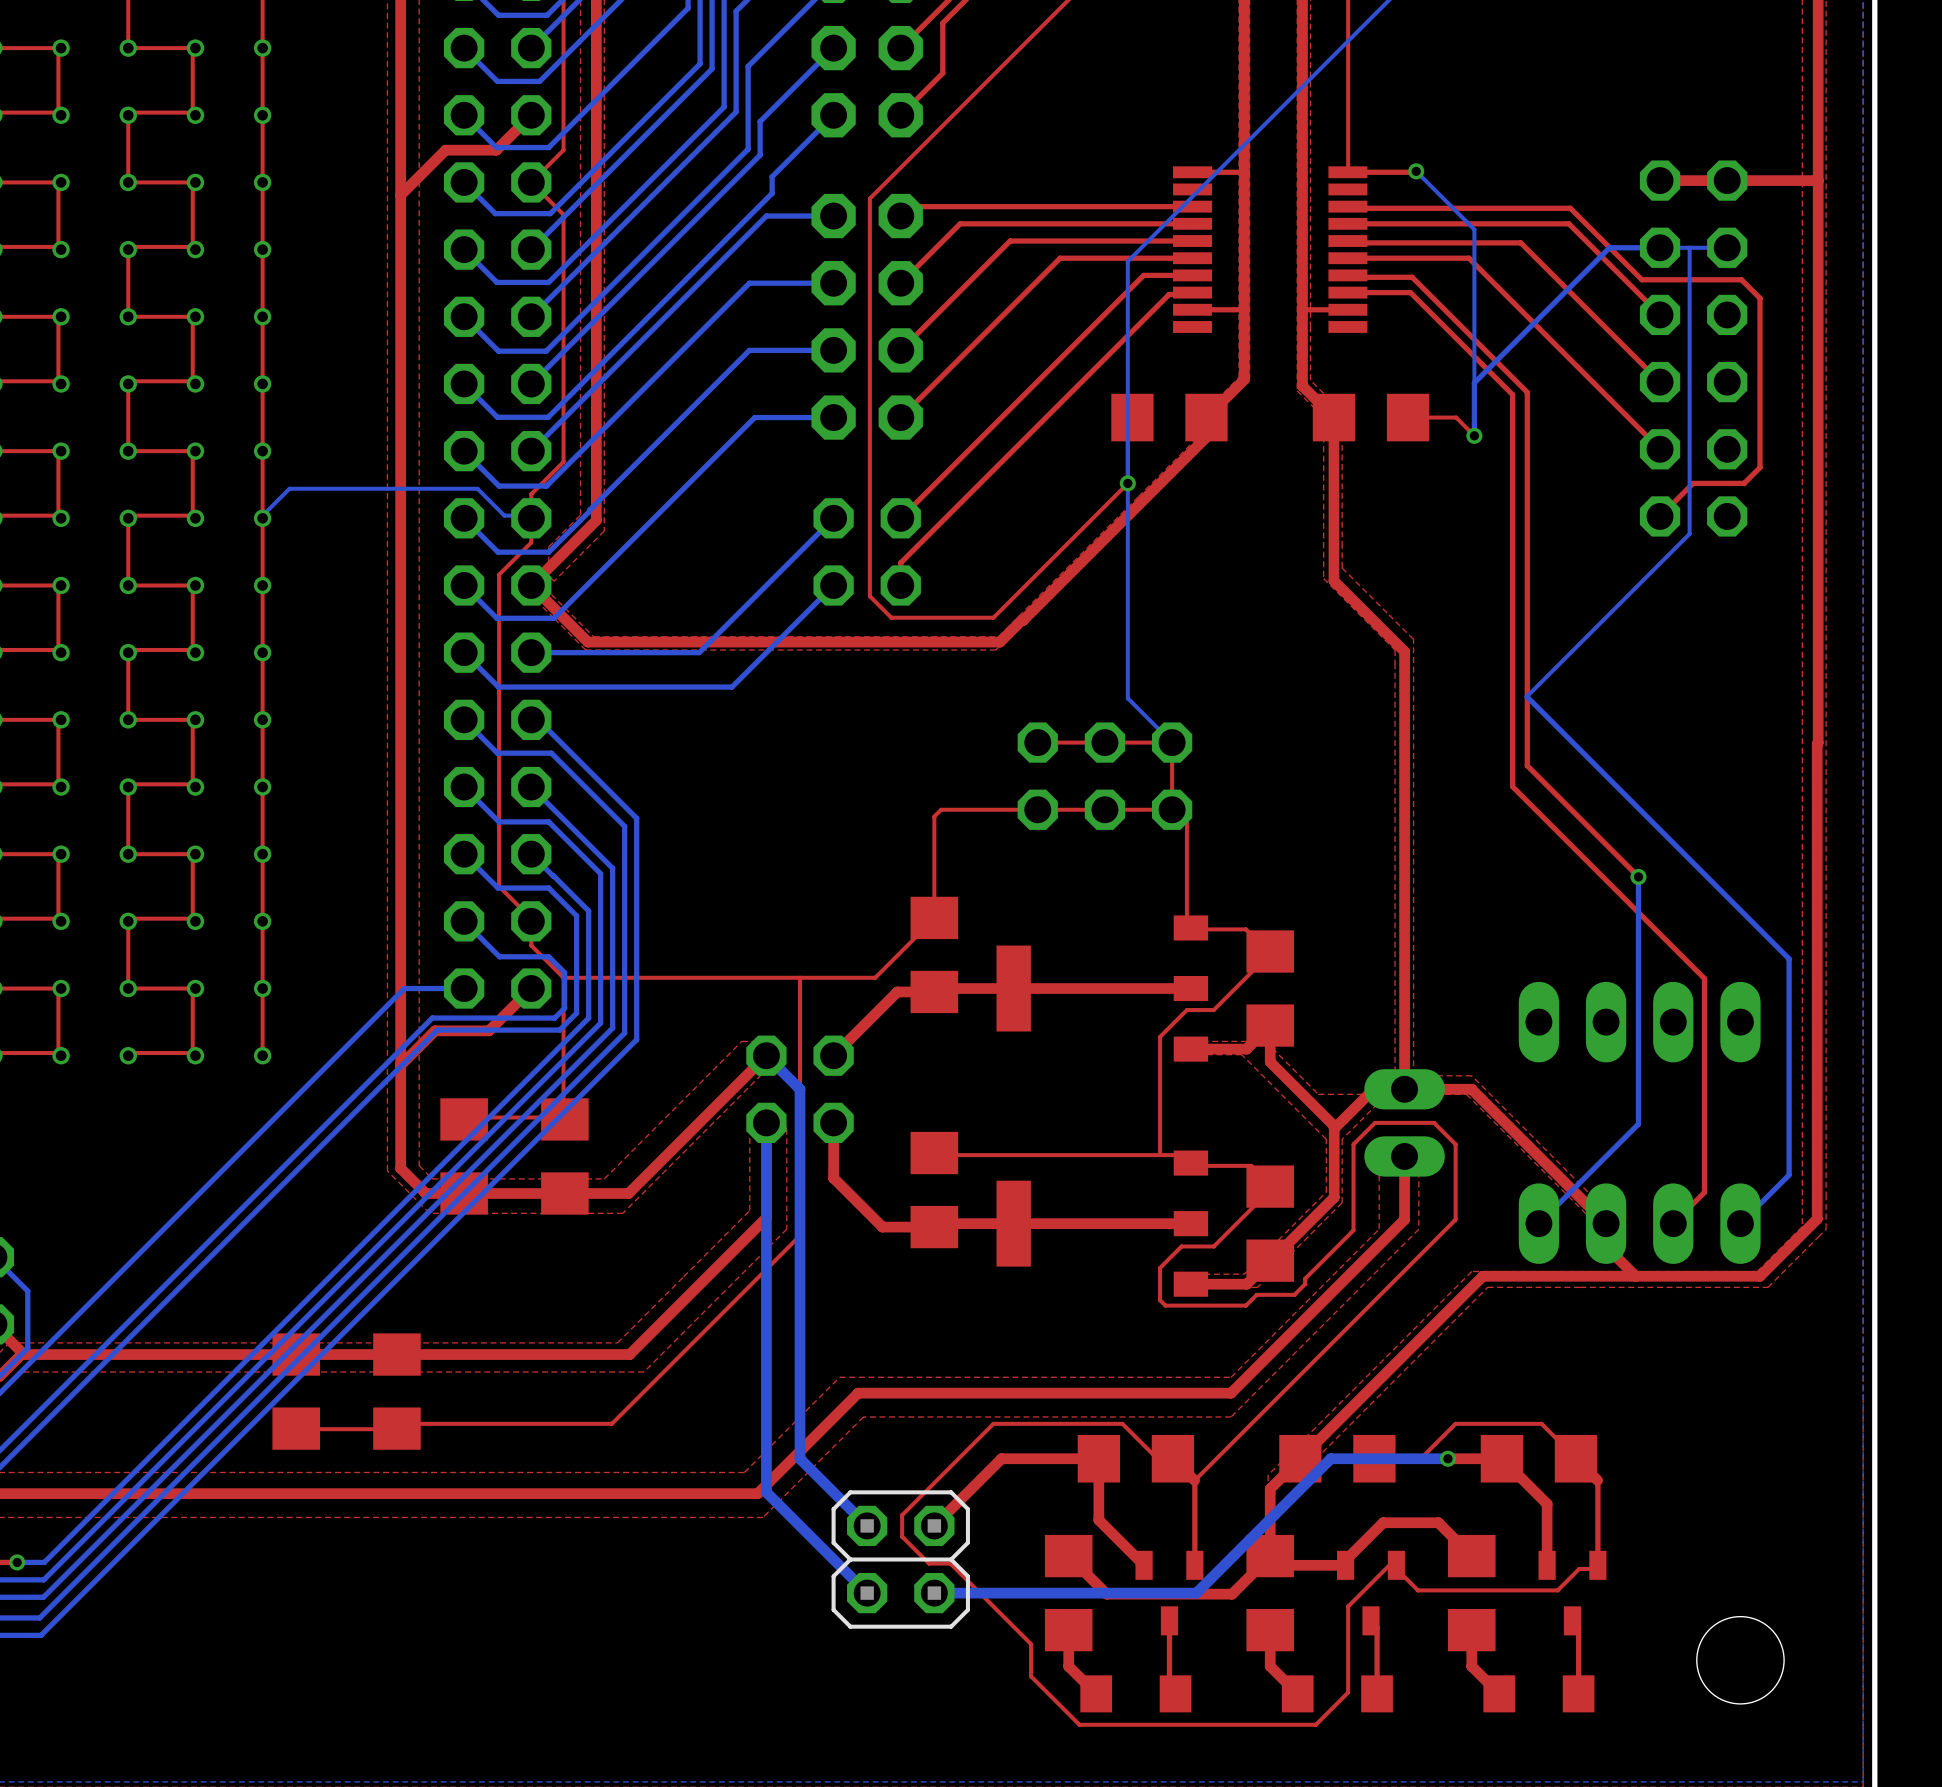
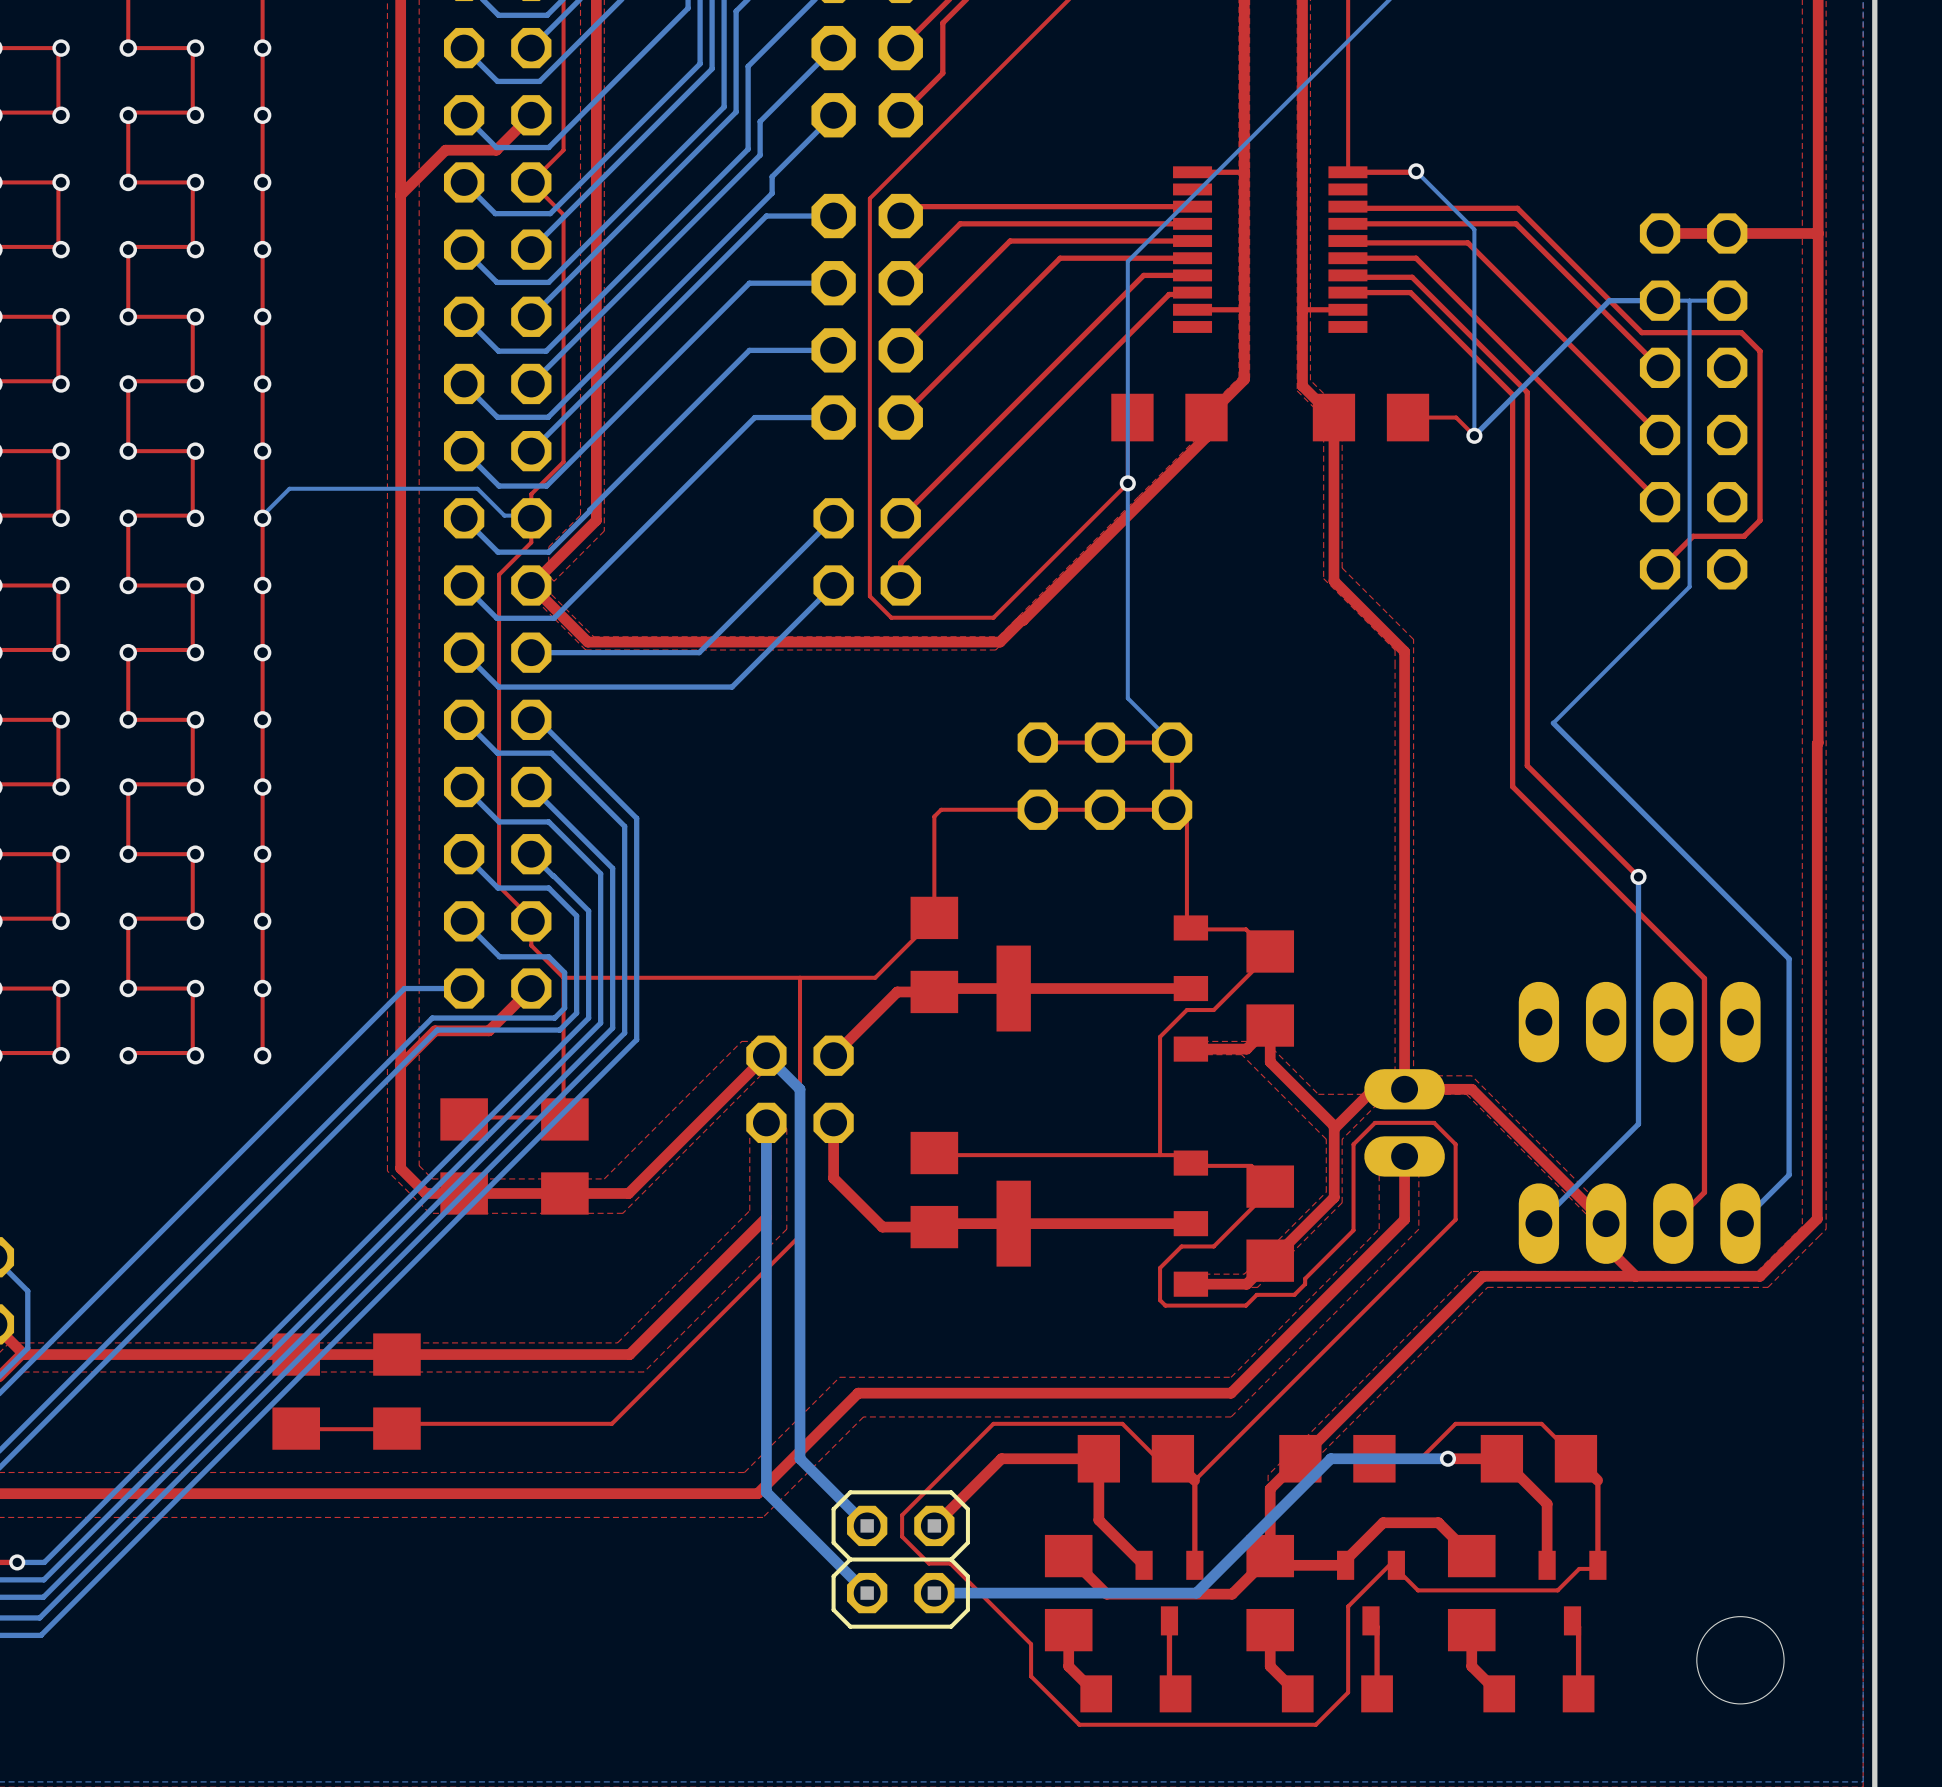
top track: (1818, 180) (1660, 180) -> (1818, 233) (1660, 233)
top track: (1517, 208) (1570, 208) (1641, 279) (1741, 279) (1760, 298) (1760, 351) -> (1517, 208) (1641, 332) (1741, 332) (1760, 351)
top track: (1516, 223) (1568, 223) (1660, 314) -> (1516, 223) (1660, 367)
top track: (1467, 242) (1520, 242) (1660, 382) -> (1467, 242) (1660, 435)
bottom track: (1689, 247) (1689, 300) -> none
bottom track: (1727, 247) (1609, 247) (1474, 382) (1474, 435) -> (1727, 300) (1609, 300) (1474, 435)
top track: (1416, 258) (1468, 258) (1660, 449) -> (1416, 258) (1660, 502)
part position: (1693, 348) -> (1693, 401)
top track: (1760, 467) (1744, 483) (1693, 483) (1660, 516) -> (1760, 467) (1760, 520) (1744, 536) (1693, 536) (1660, 569)
bottom track: (1689, 533) (1526, 696) (1553, 723) -> (1689, 533) (1689, 586) (1553, 723)

